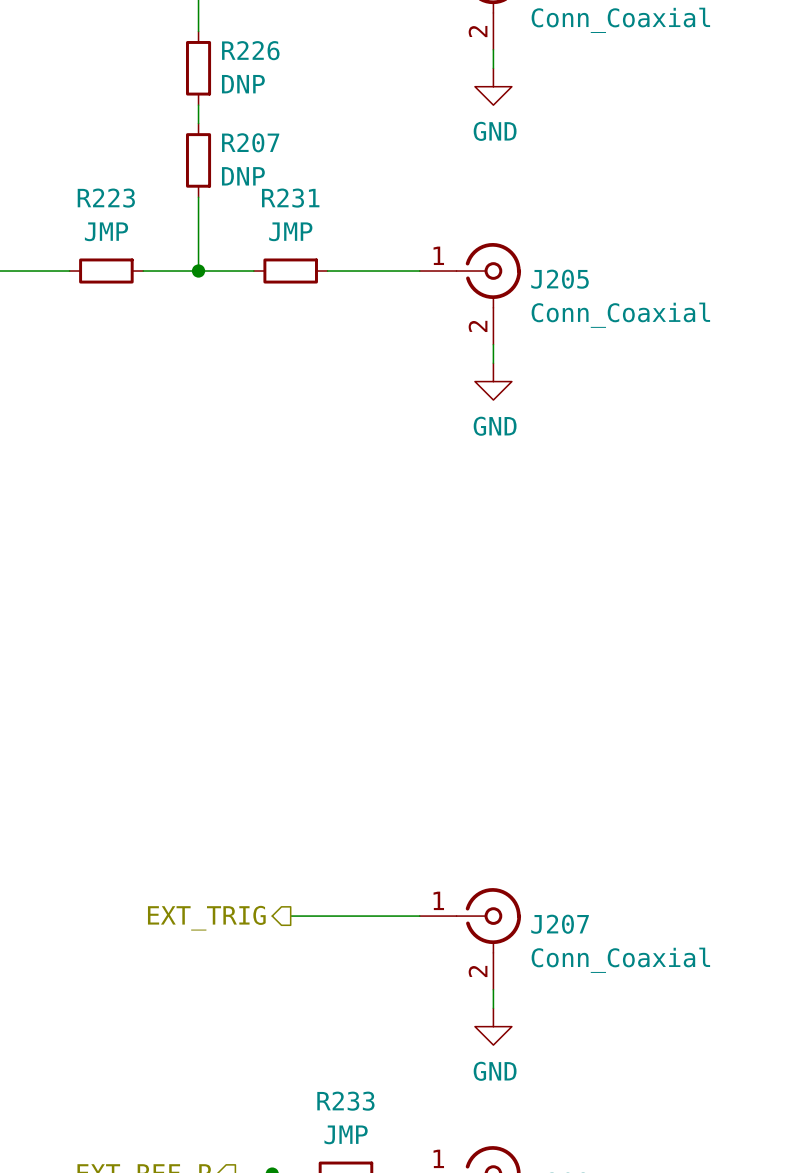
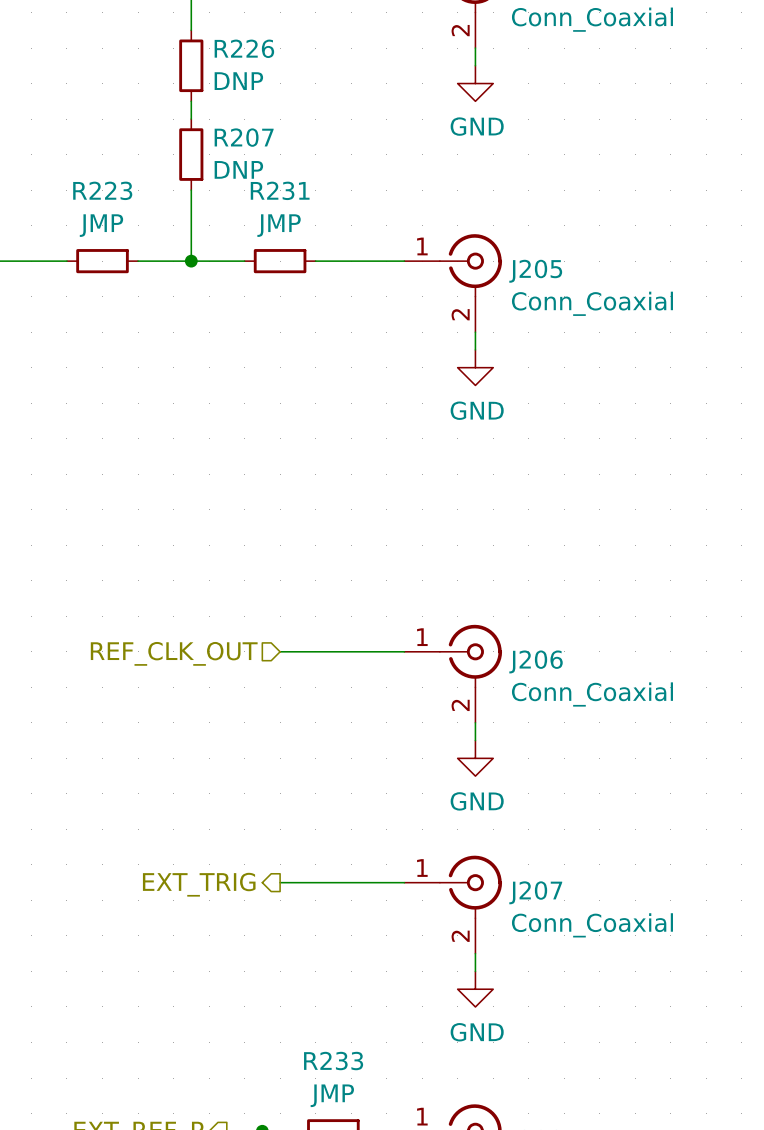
wire: none -> (280, 651) (404, 651)
hierarchical label: none -> REF_CLK_OUT (174, 653)
J206: none -> Conn_Coaxial (453, 673)
wire: none -> (475, 722) (475, 740)
power symbol: none -> GND (475, 758)

